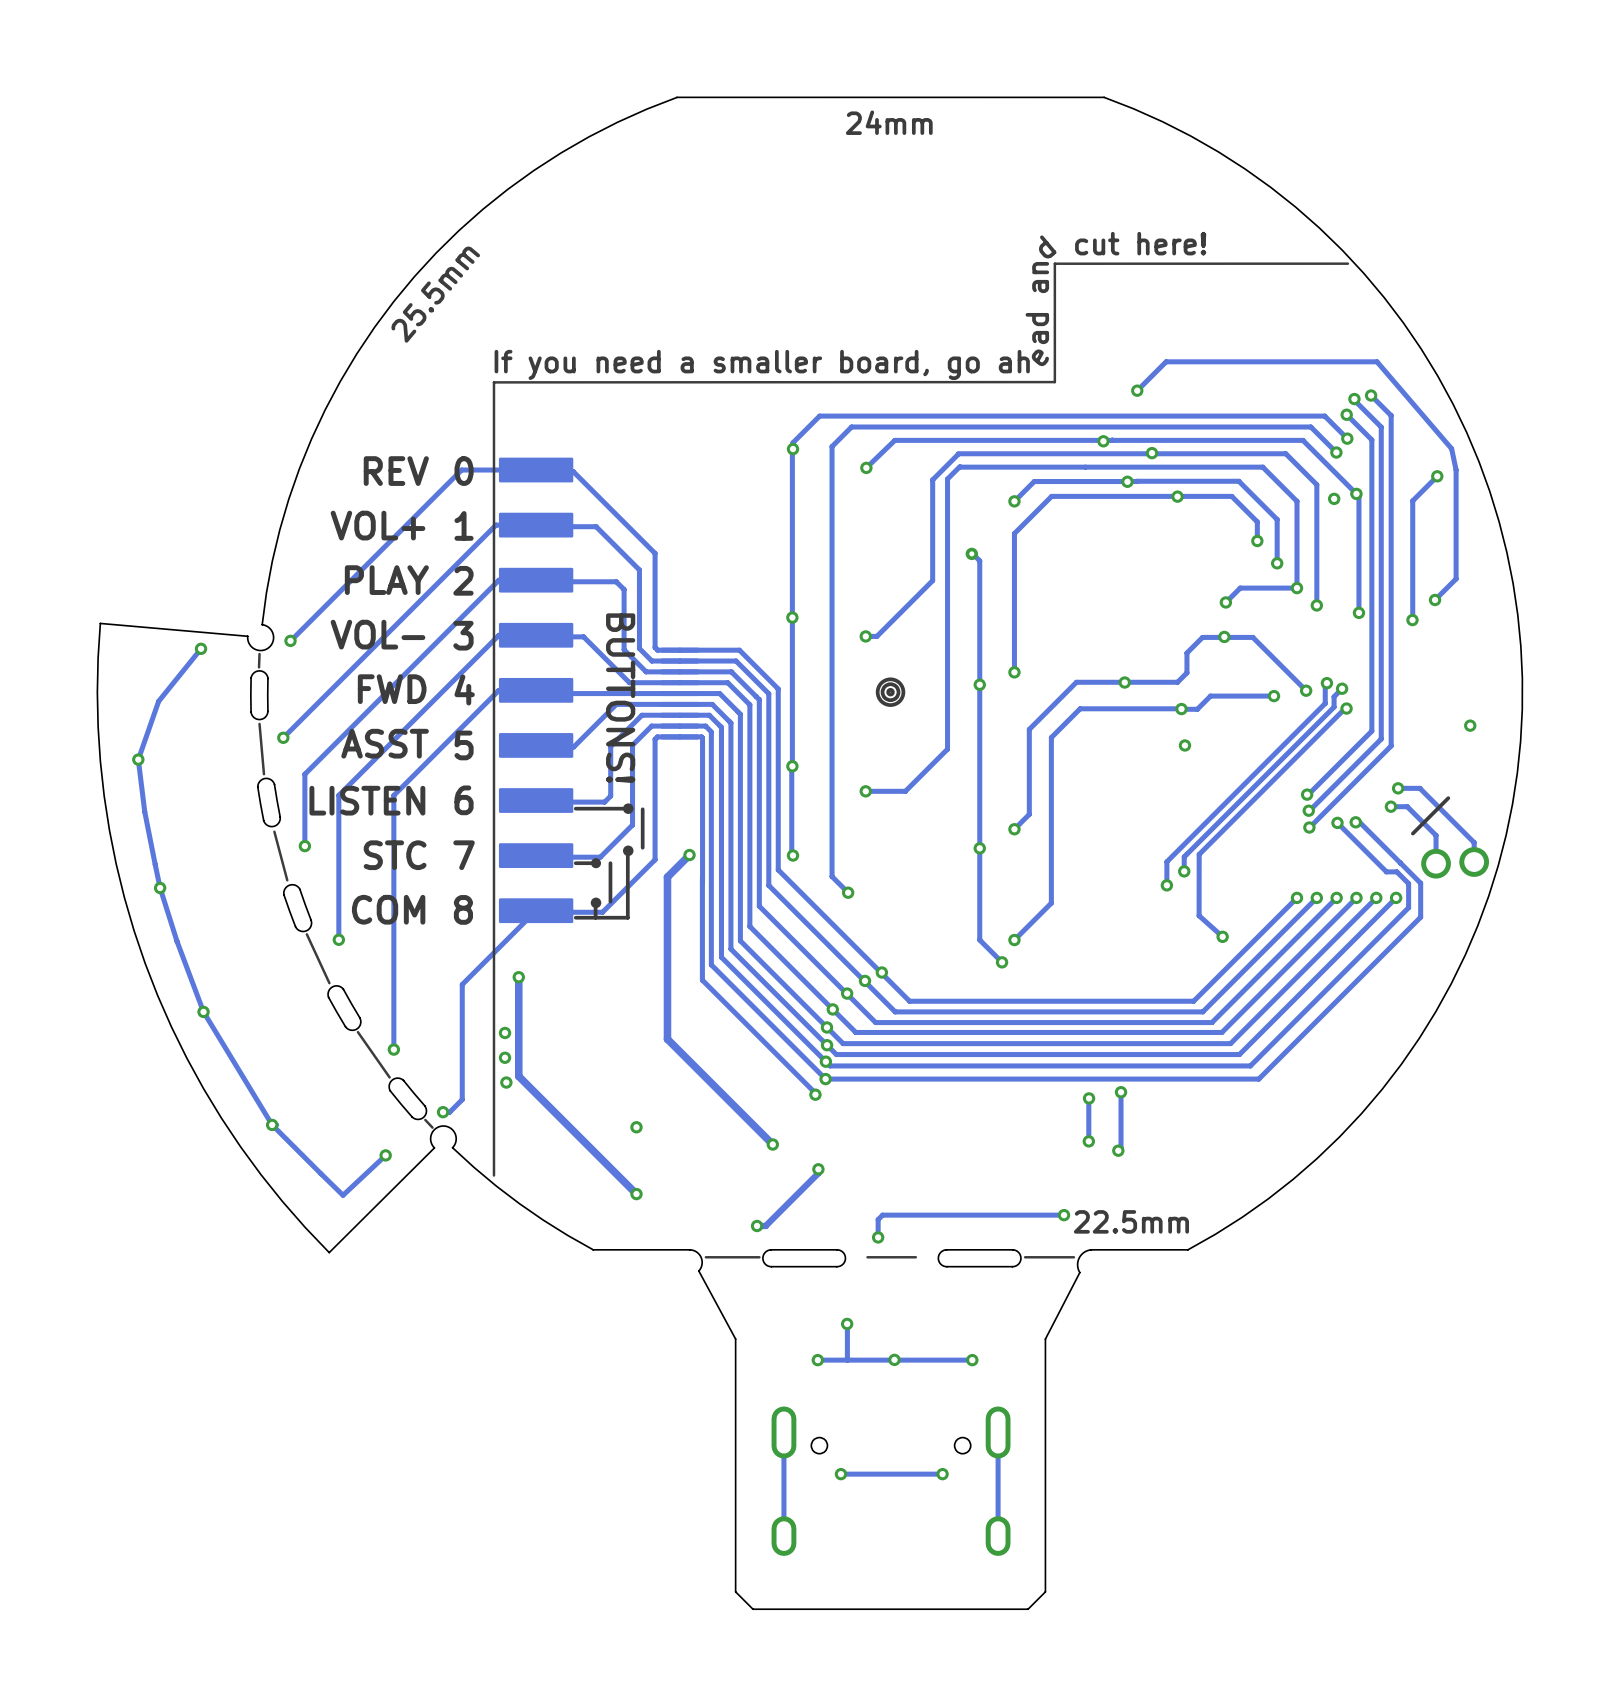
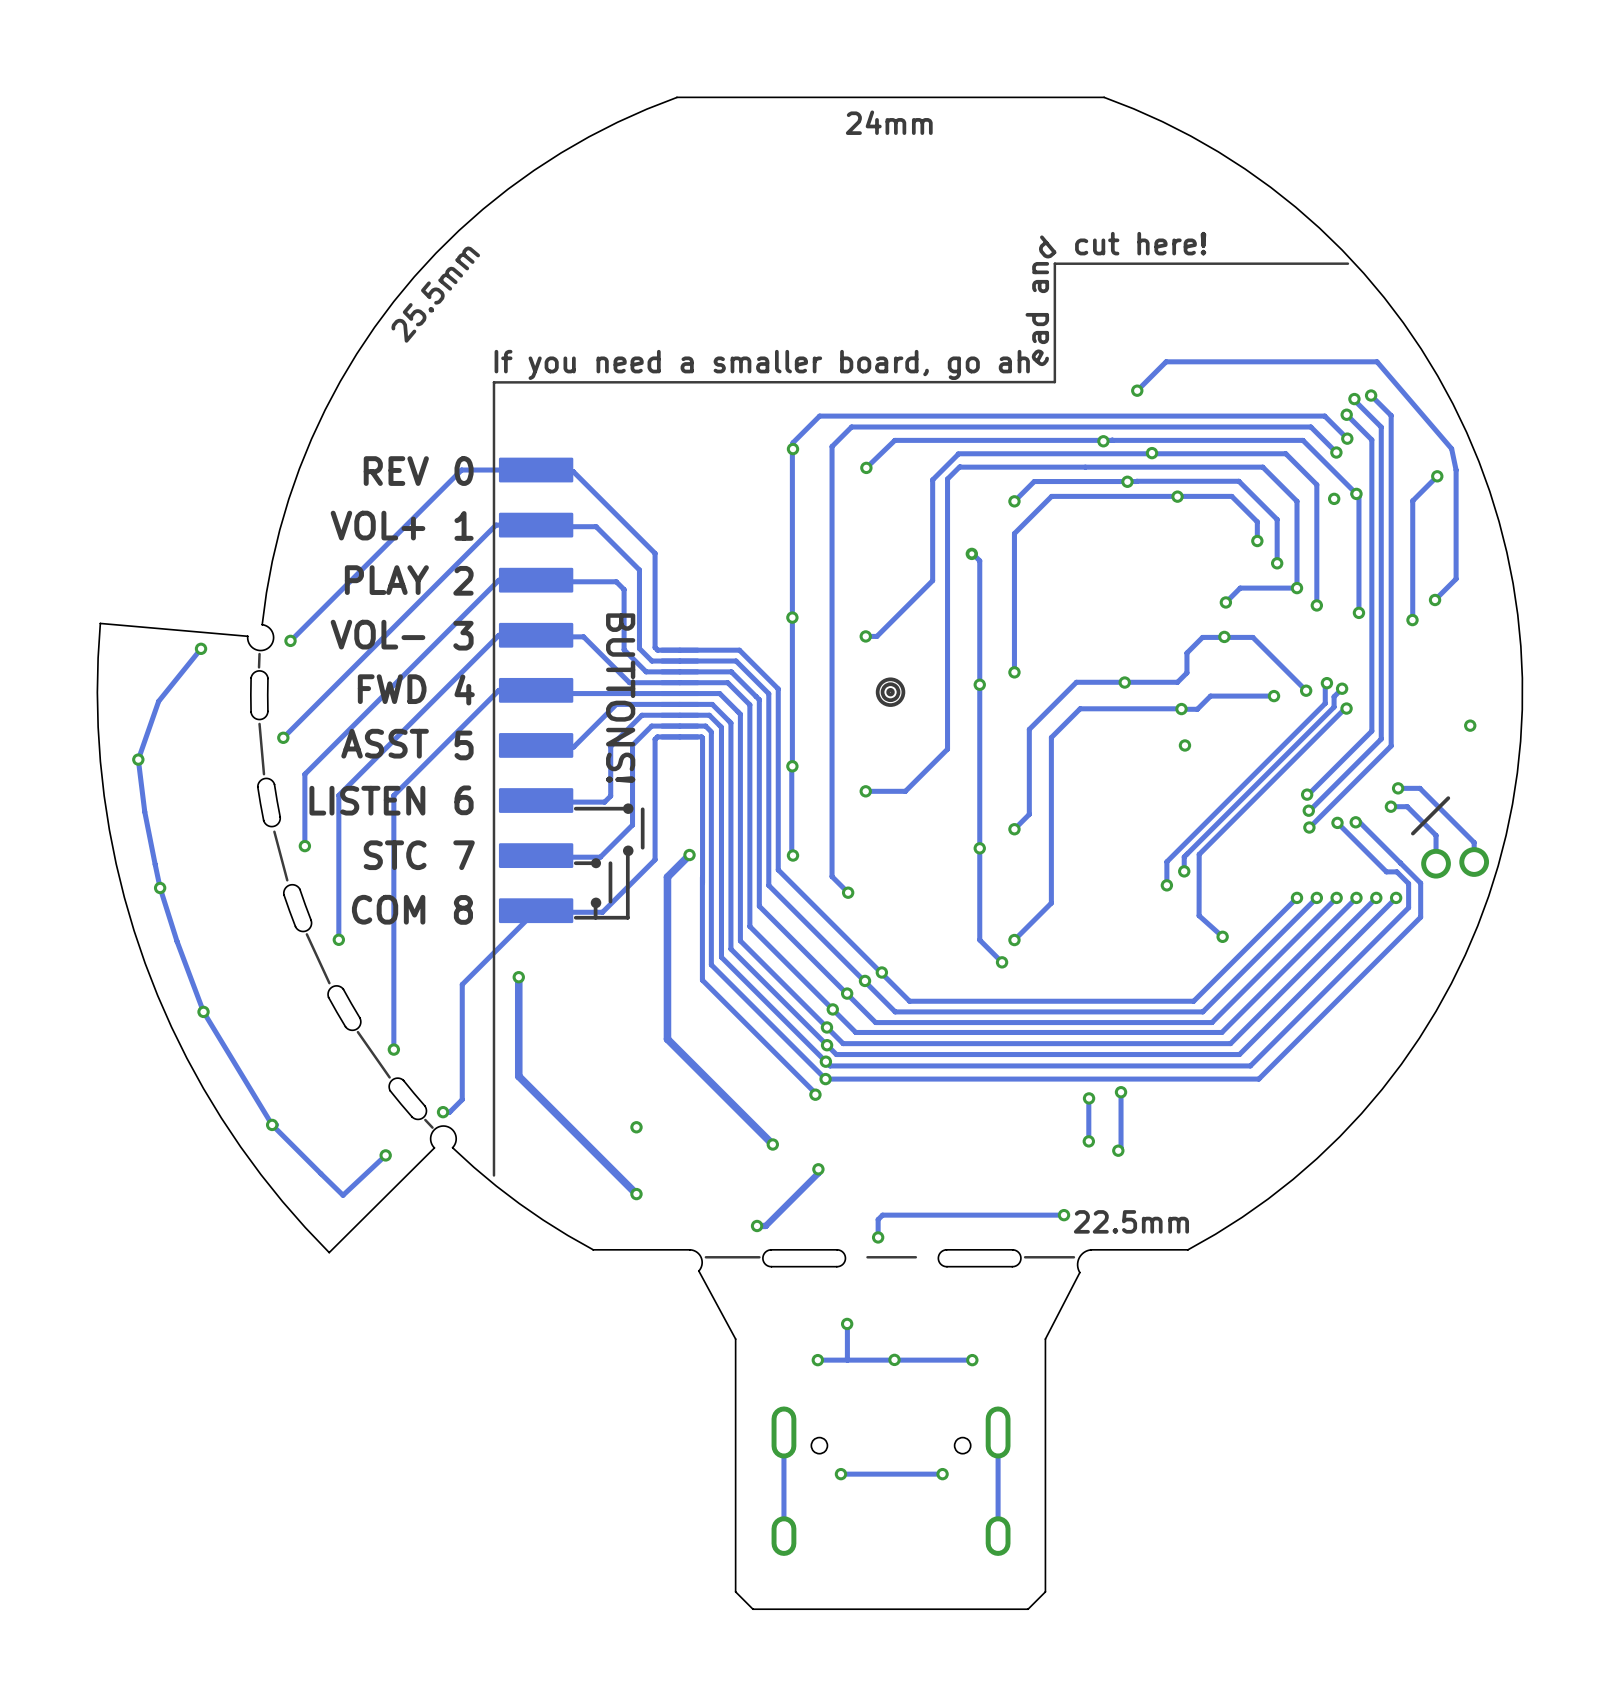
via: (505, 1032) -> none
via: (505, 1057) -> none
via: (506, 1082) -> none

